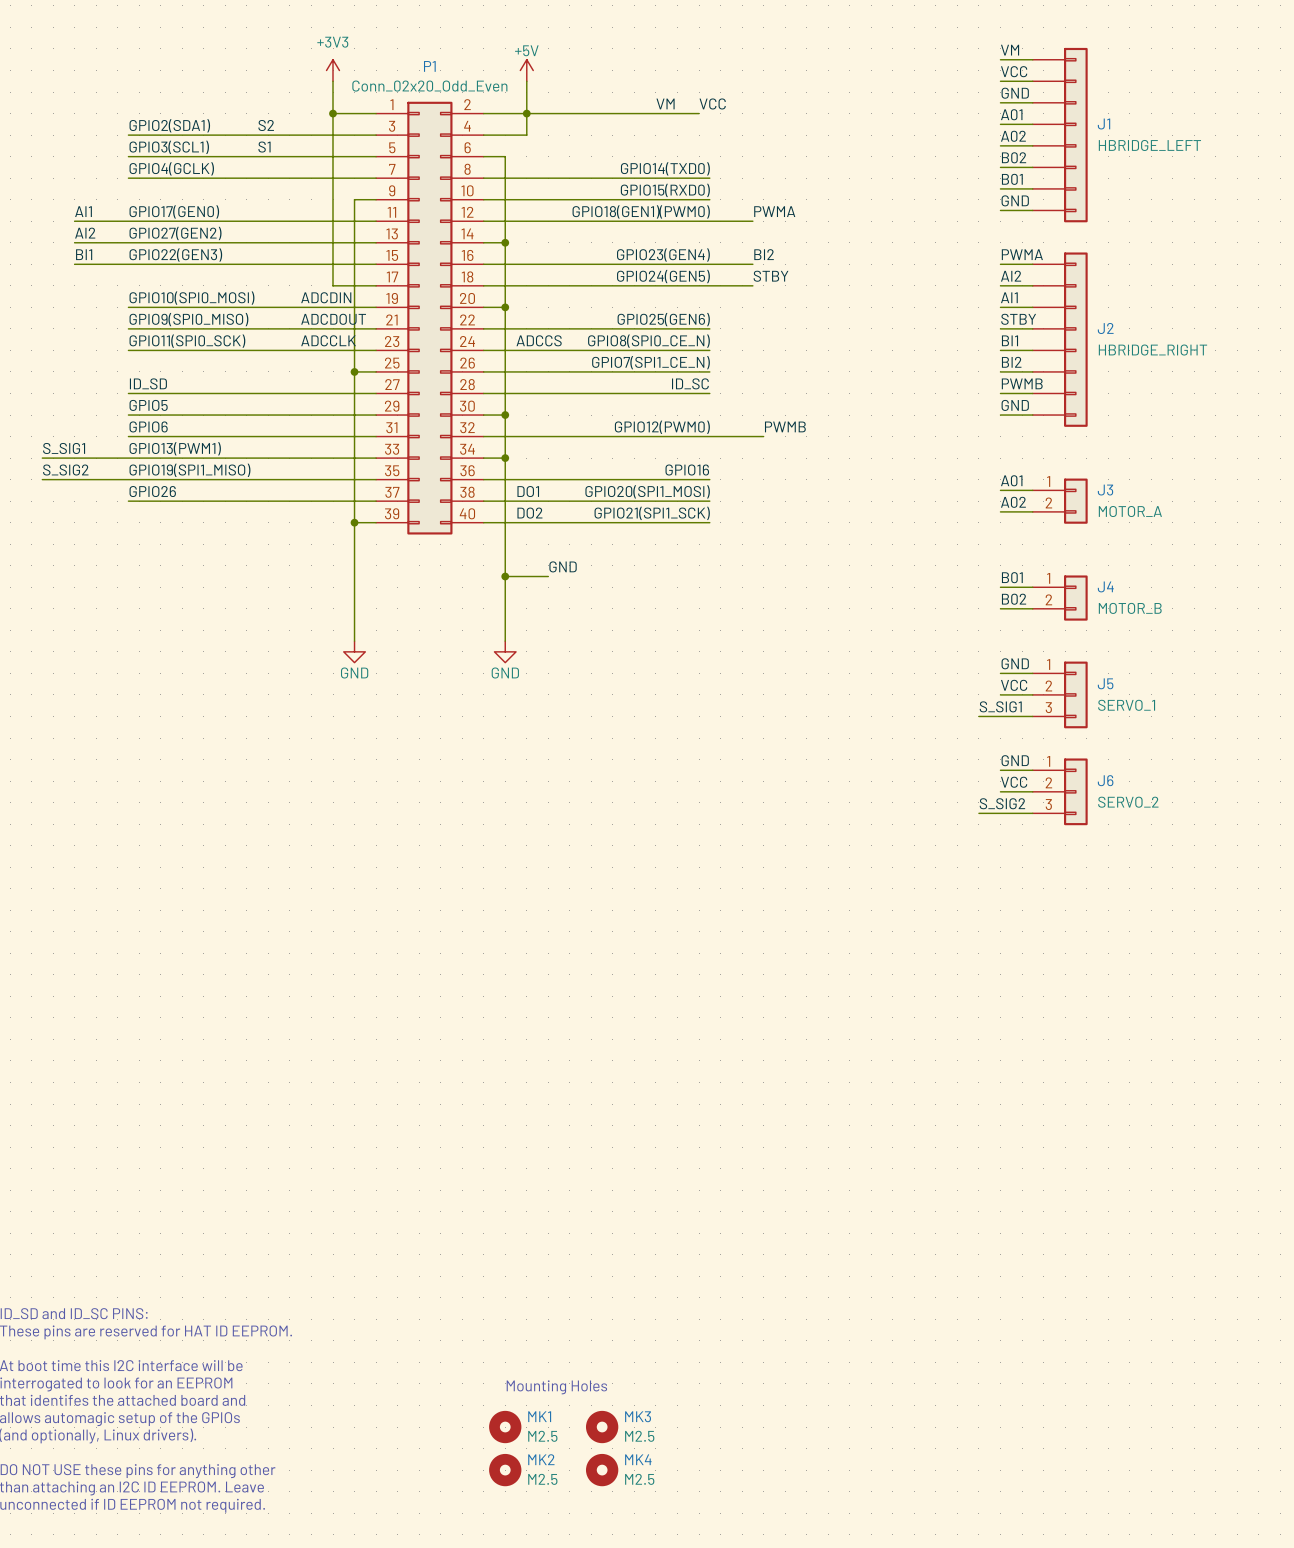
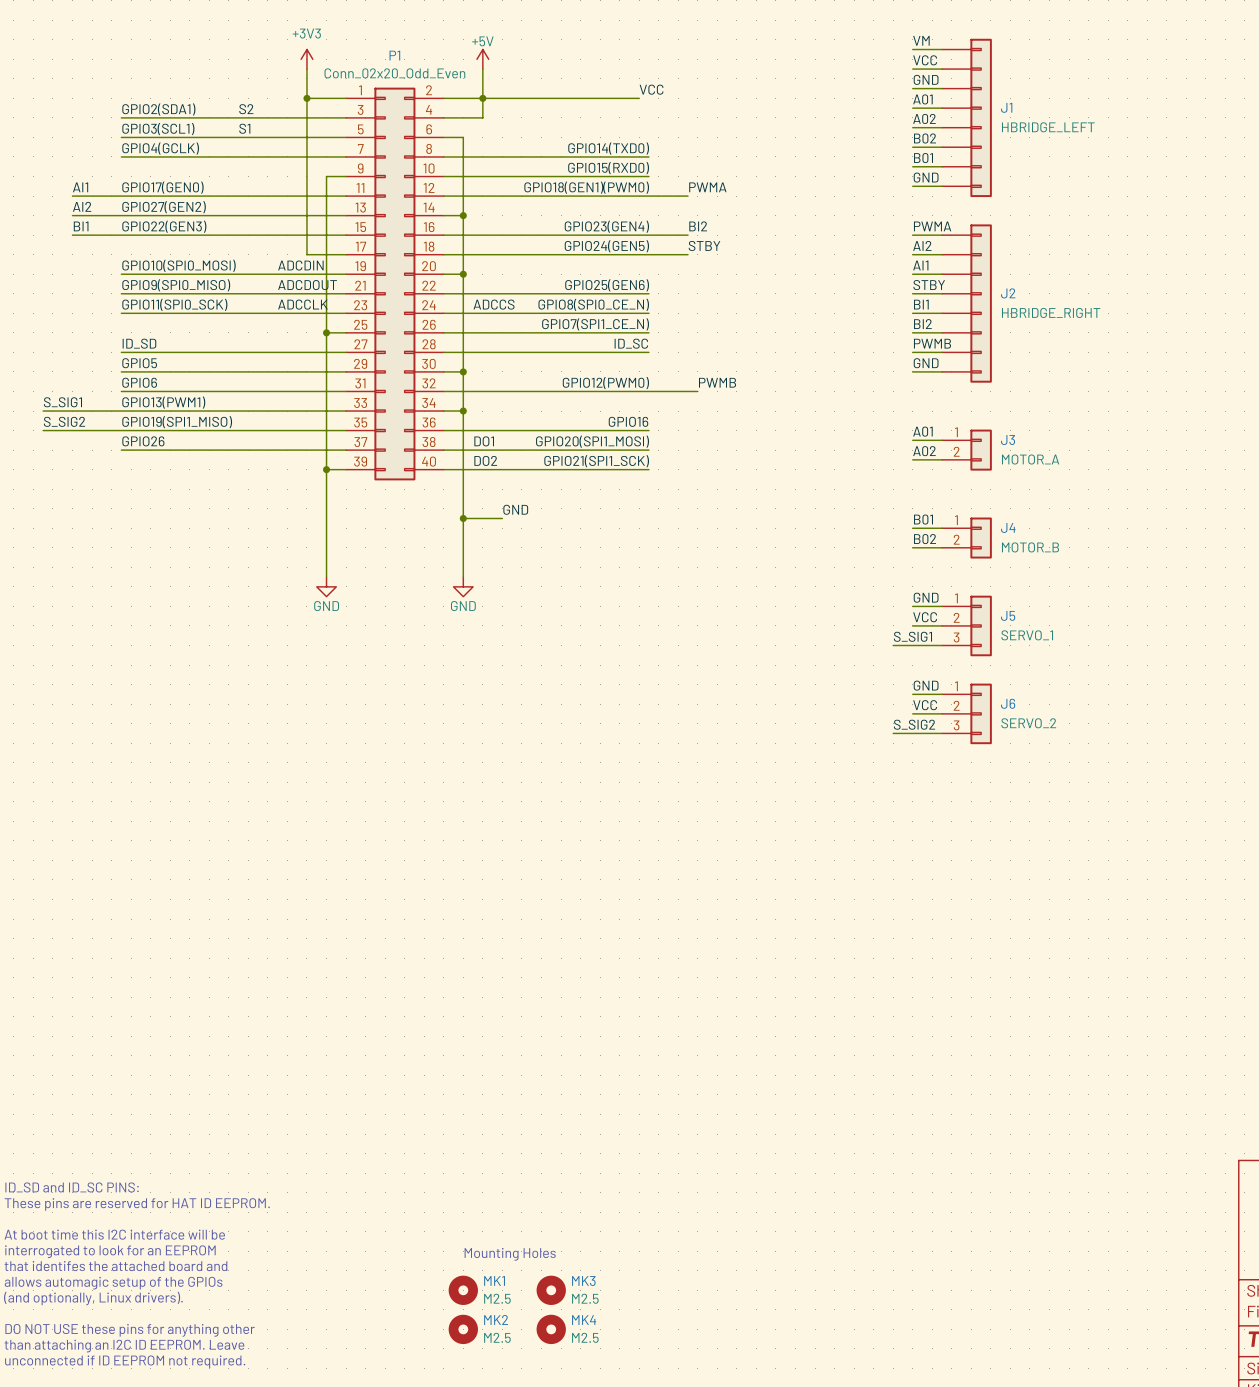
label: VM (665, 103) -> none

